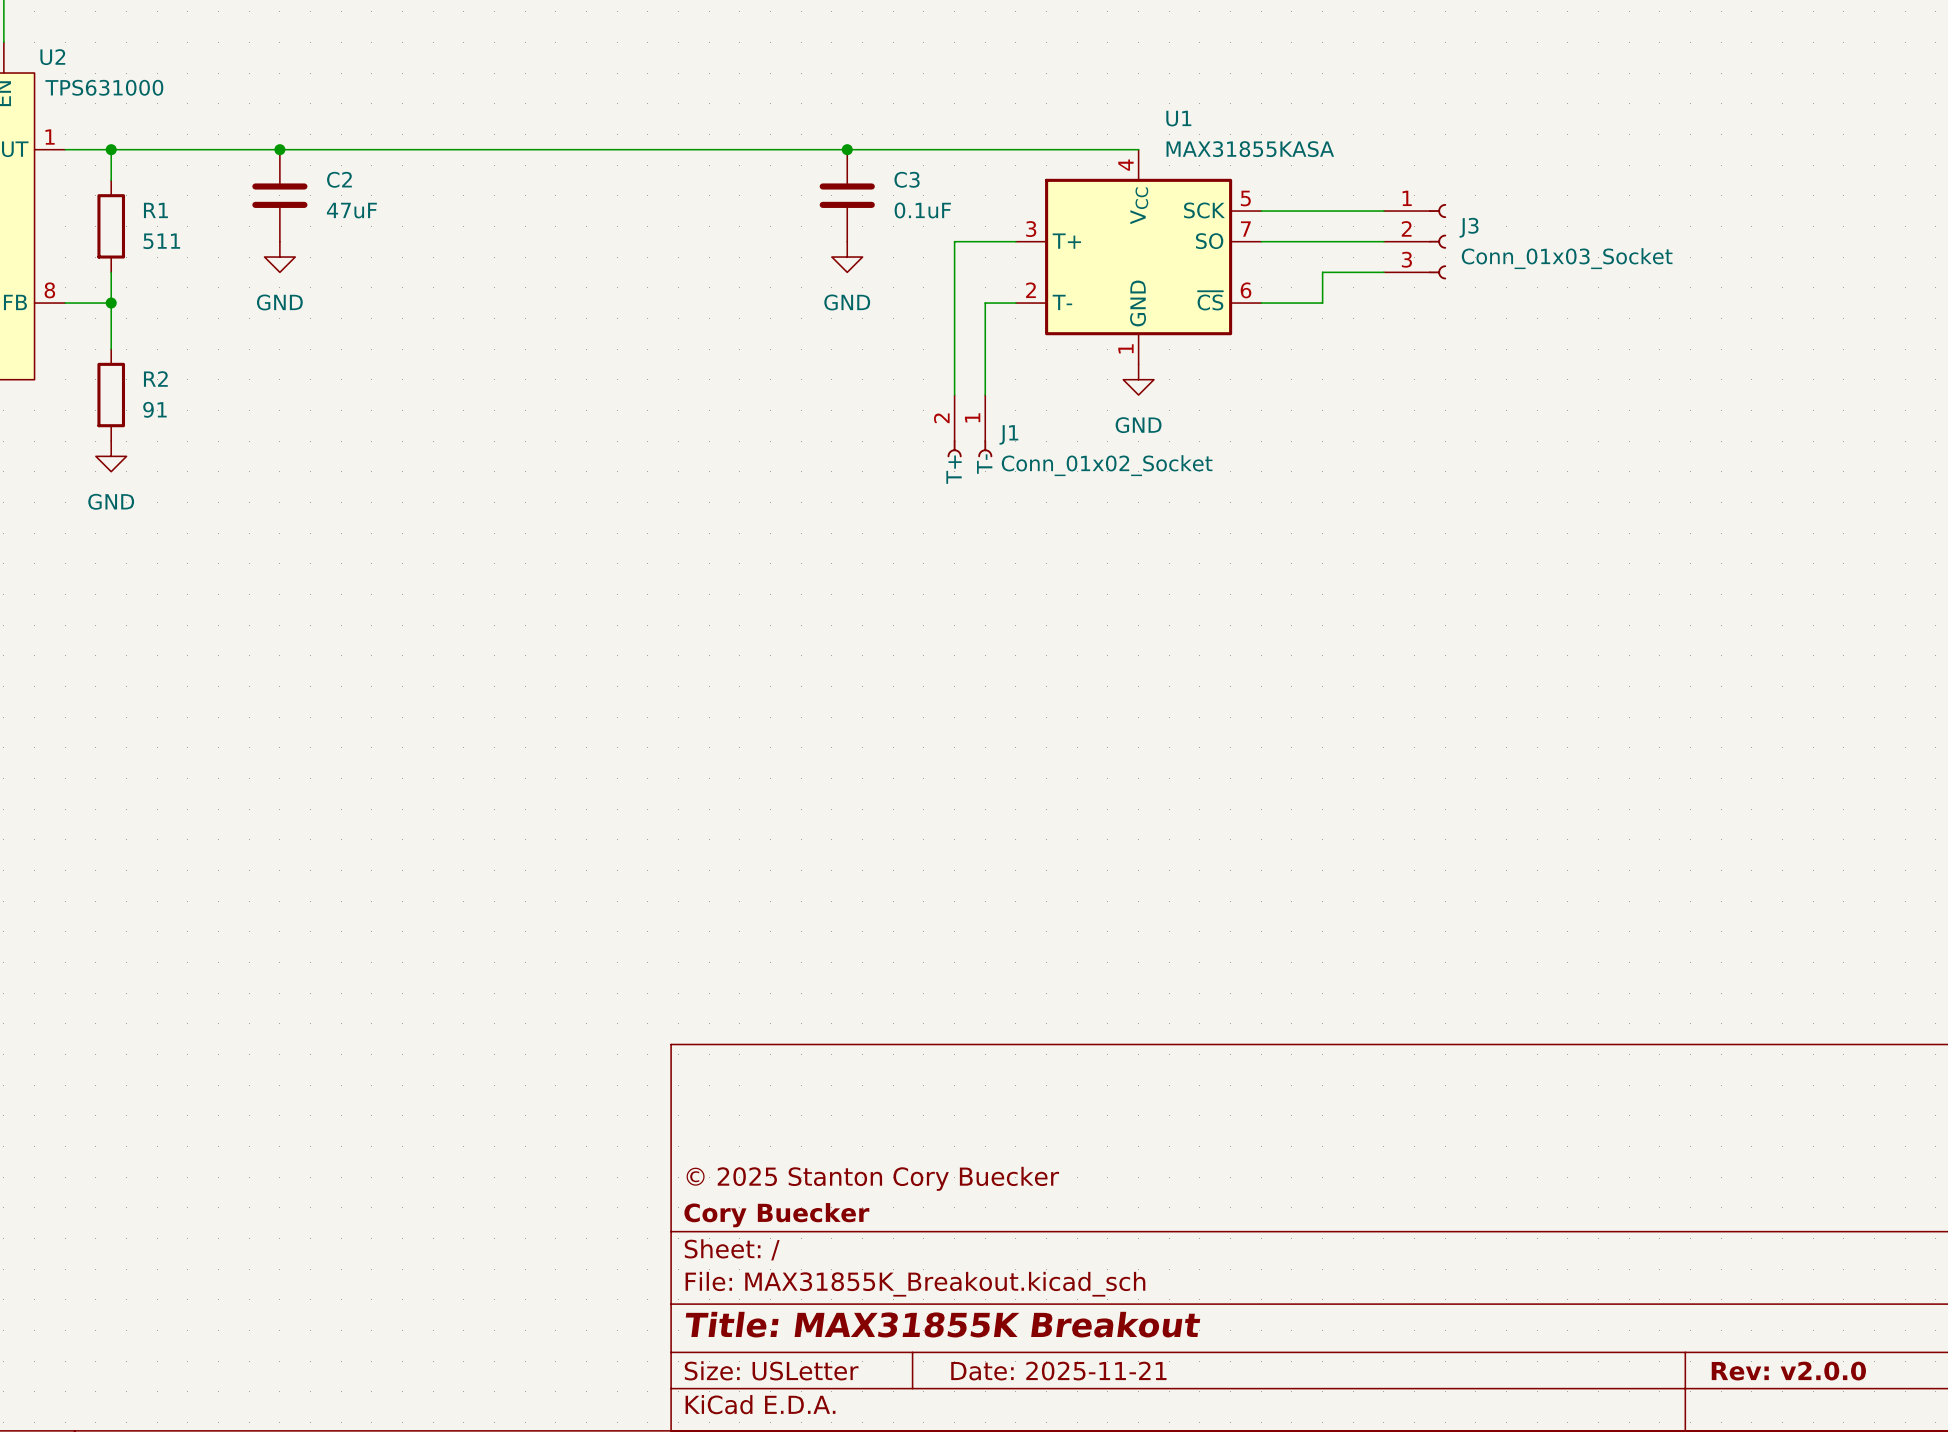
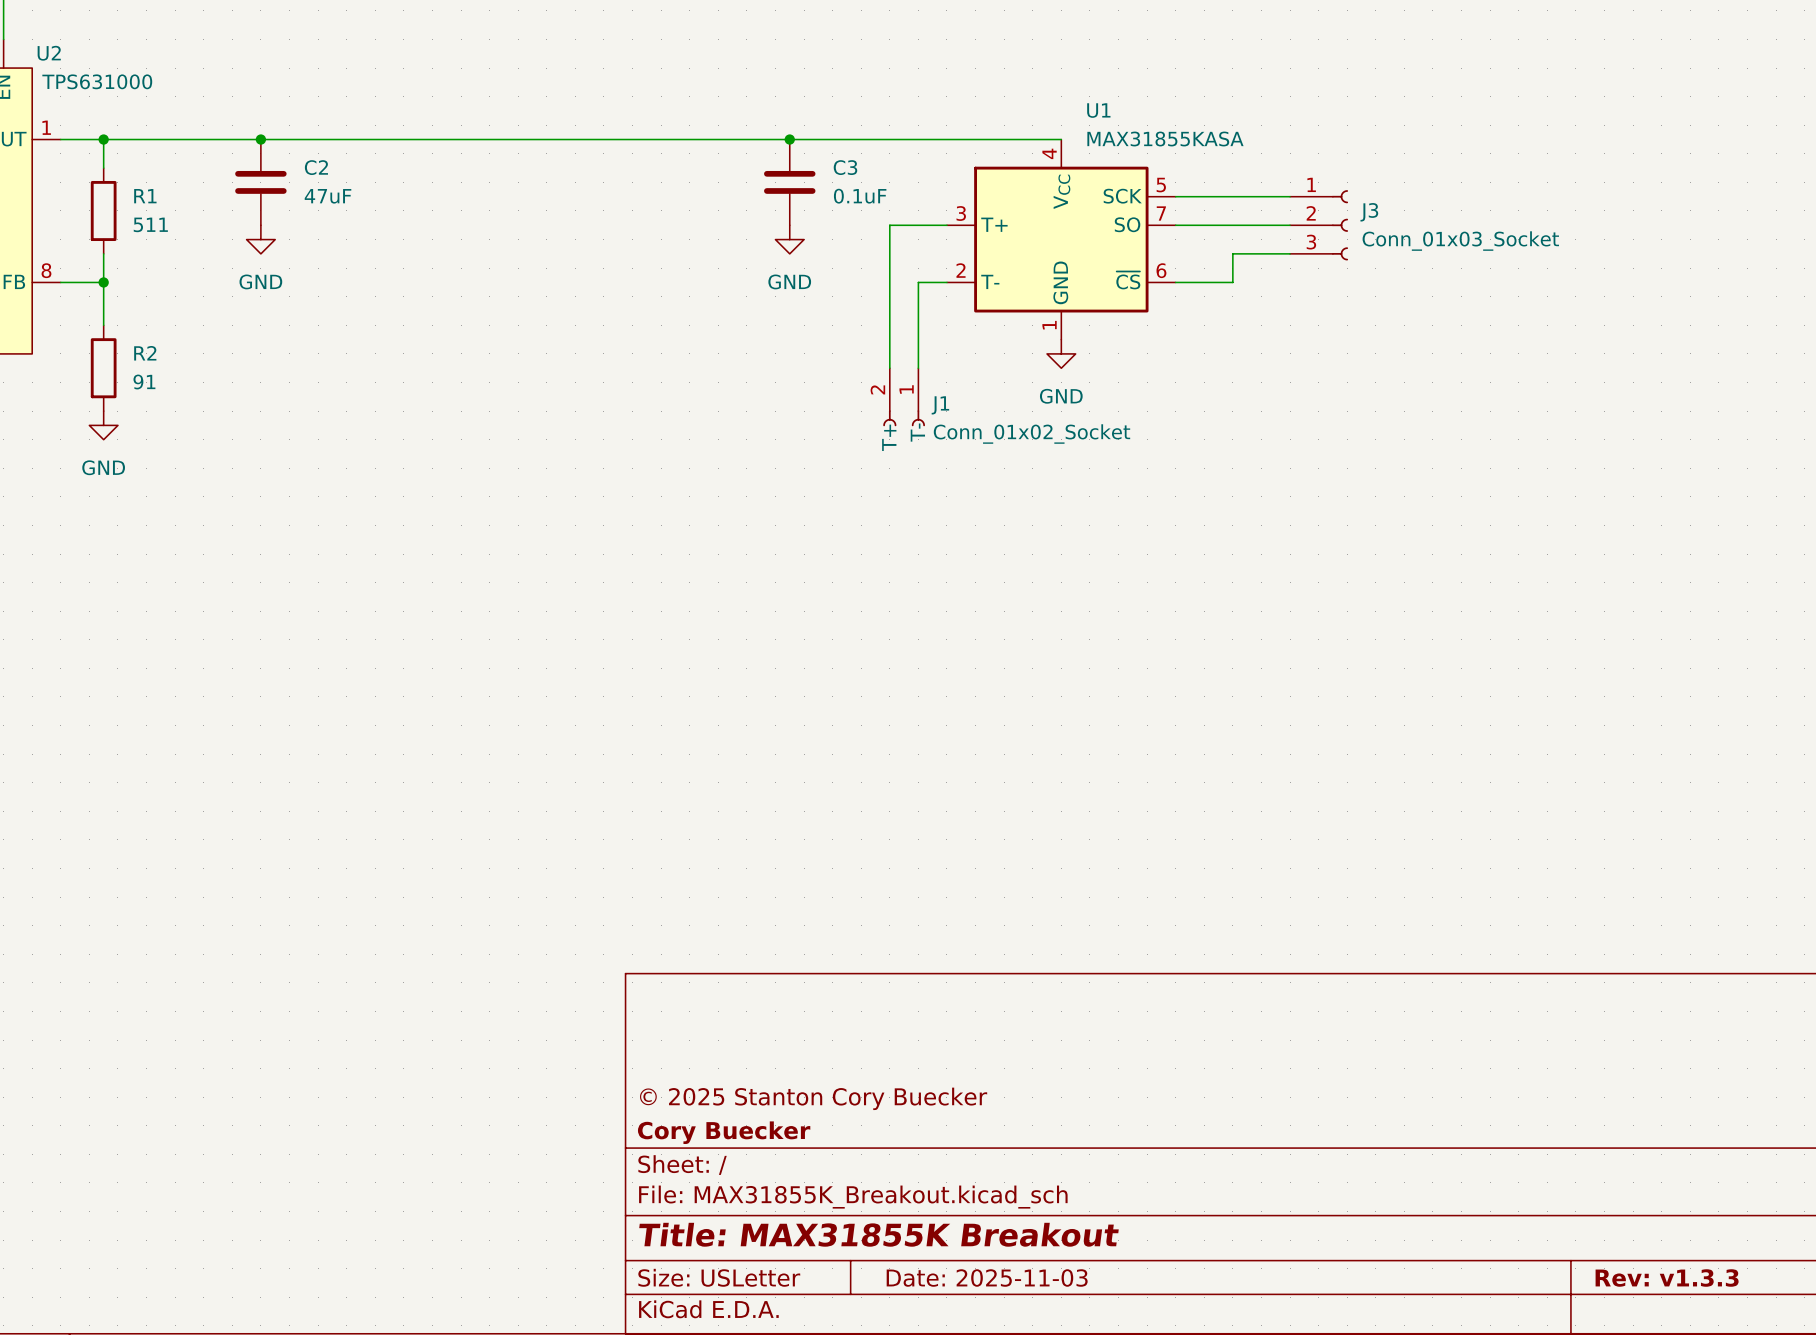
title block: Date: 2025-11-21 (1058, 1371) -> Date: 2025-11-03 (987, 1278)
title block: Rev: v2.0.0 (1788, 1371) -> Rev: v1.3.3 (1667, 1278)

